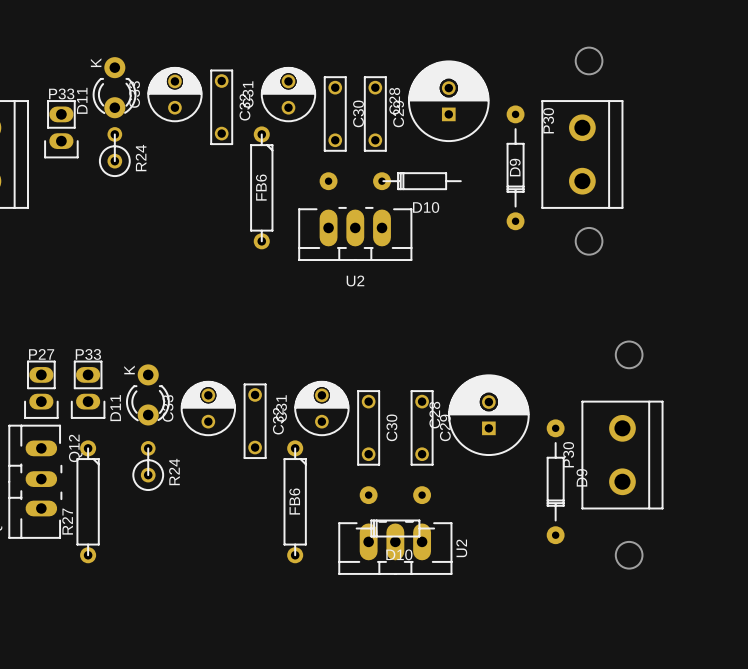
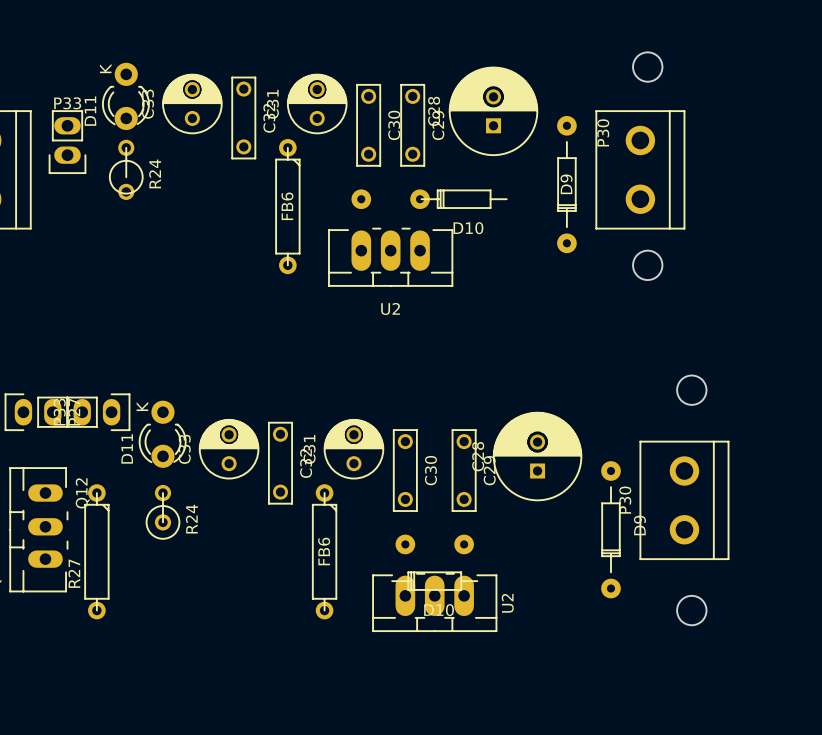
R24 footprint: [99, 127, 131, 177] -> [108, 139, 144, 200]
P27 rotation: 0° (41, 389) -> 90° clockwise (36, 412)
P33 rotation: 0° (88, 389) -> 90° counterclockwise (98, 412)

